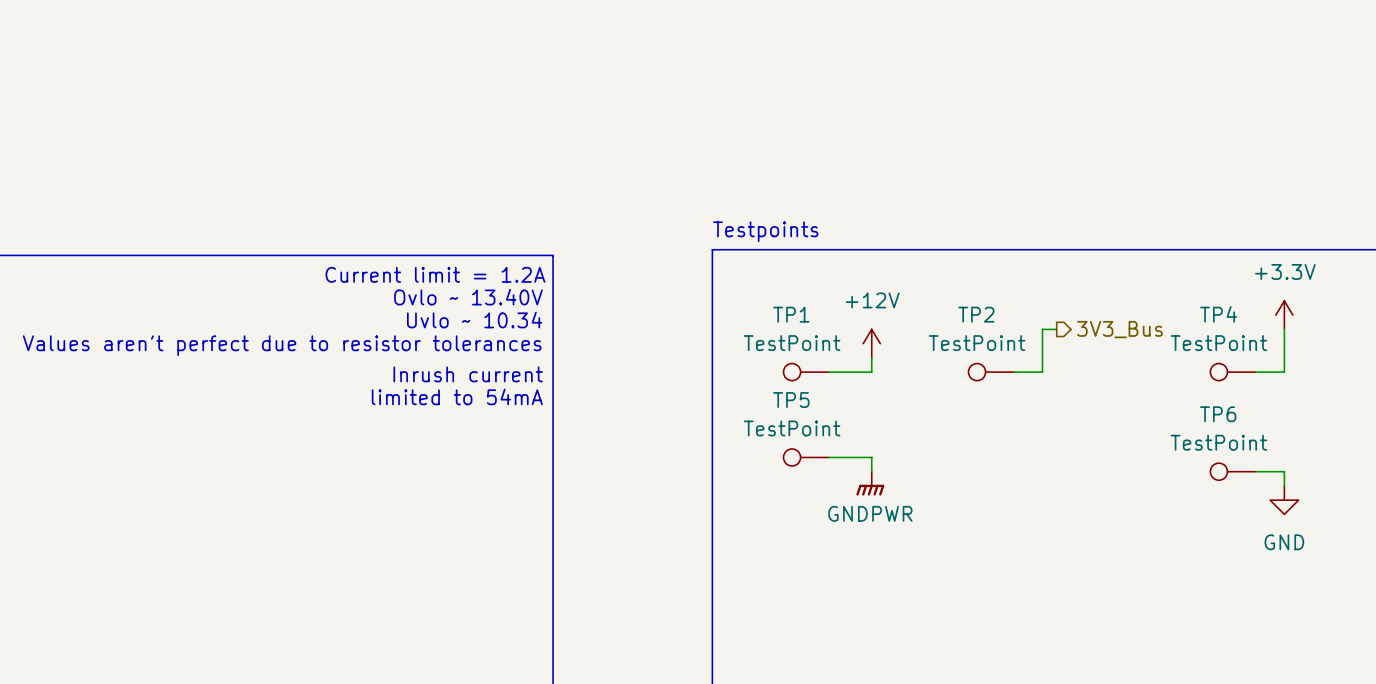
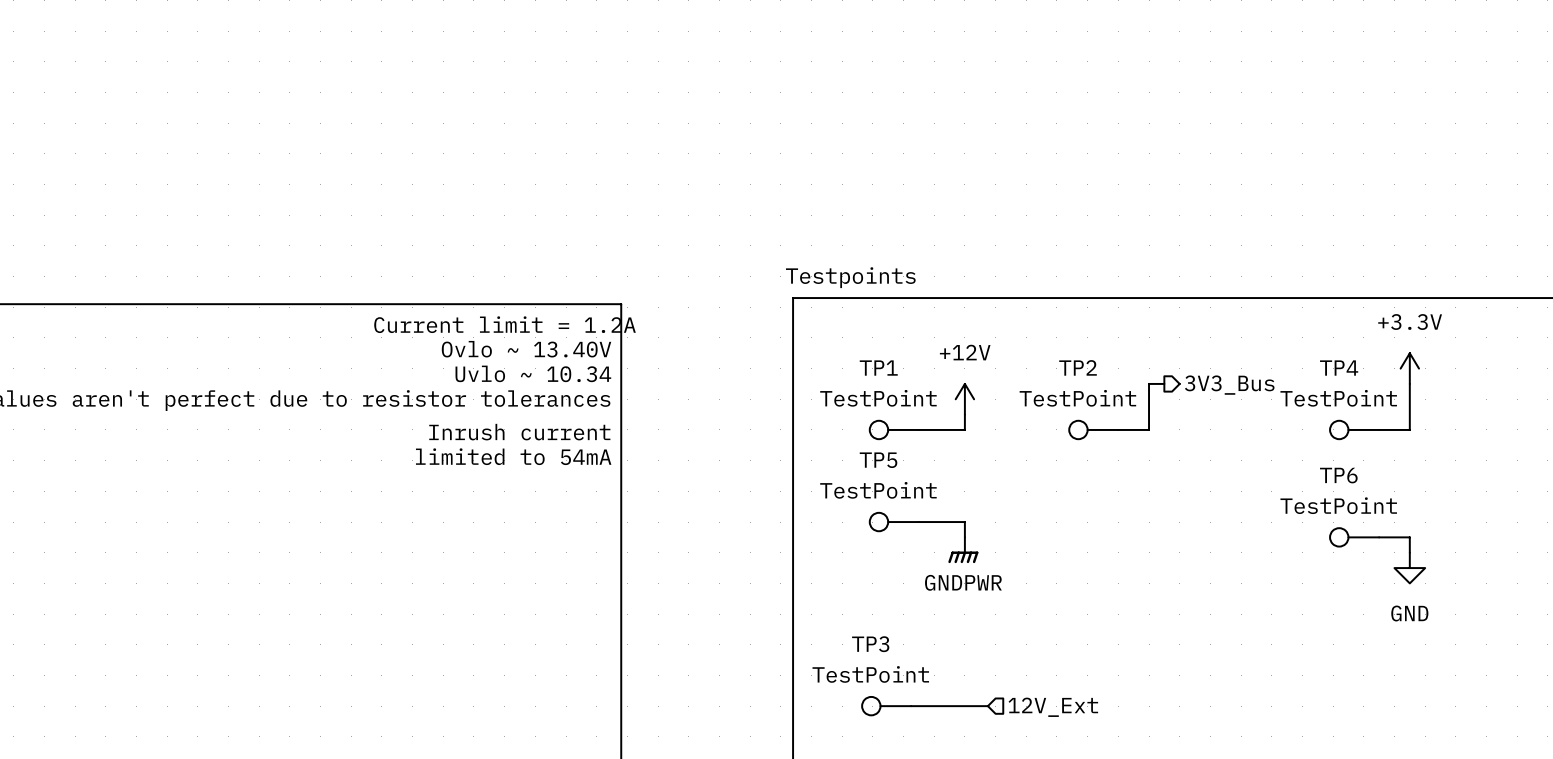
TP3: none -> TestPoint (886, 706)
wire: none -> (911, 706) (987, 706)
hierarchical label: none -> 12V_Ext (1053, 707)

